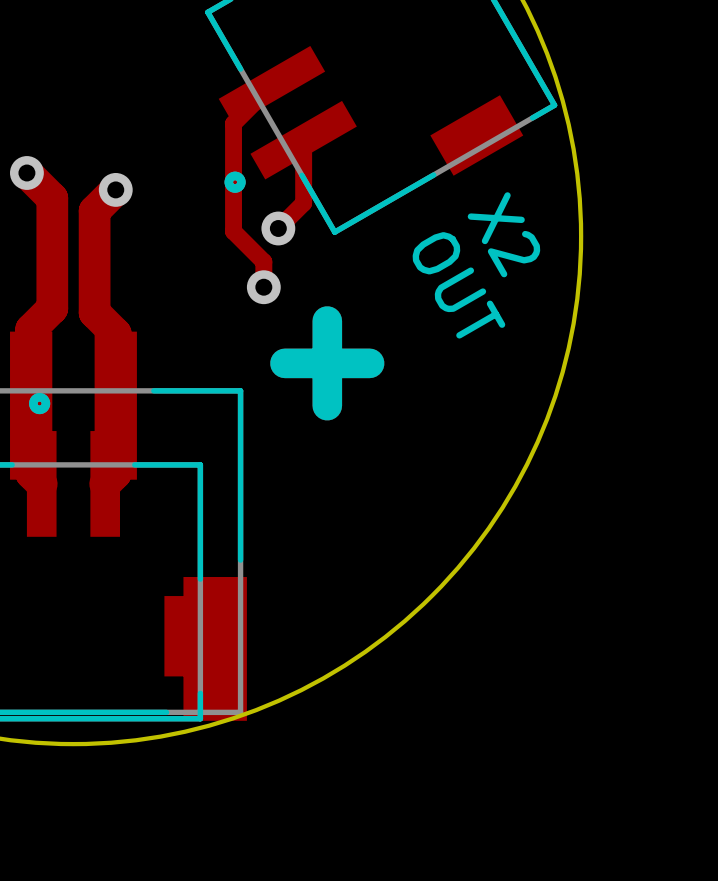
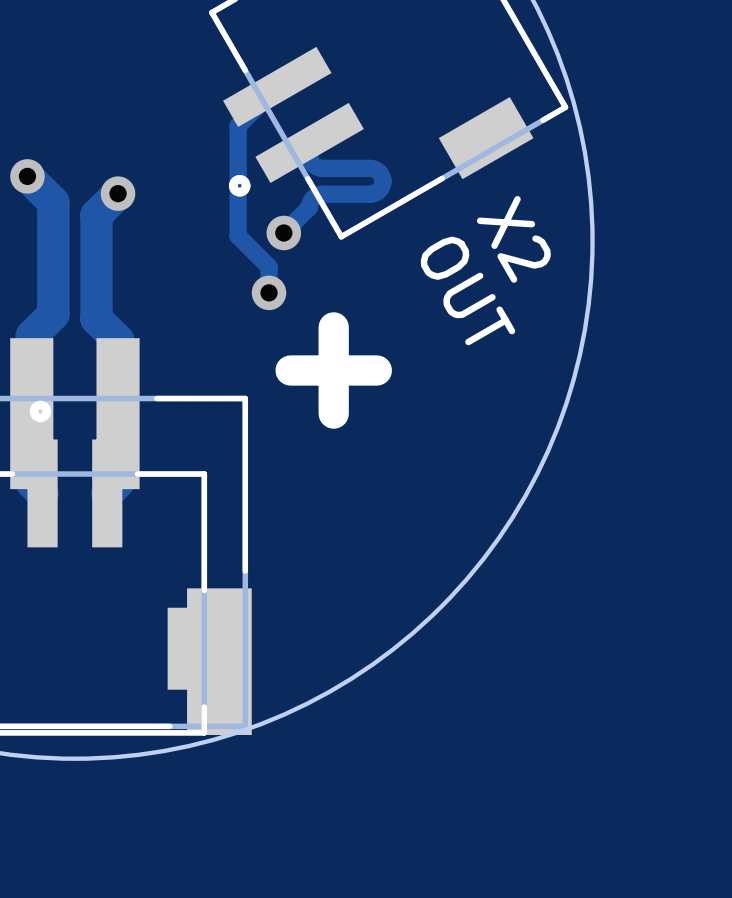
track: (303, 152) (303, 203) -> (309, 155) (312, 163) (319, 167) (374, 169) (380, 173) (382, 181) (381, 187) (374, 193) (319, 194) (312, 199) (309, 207)

